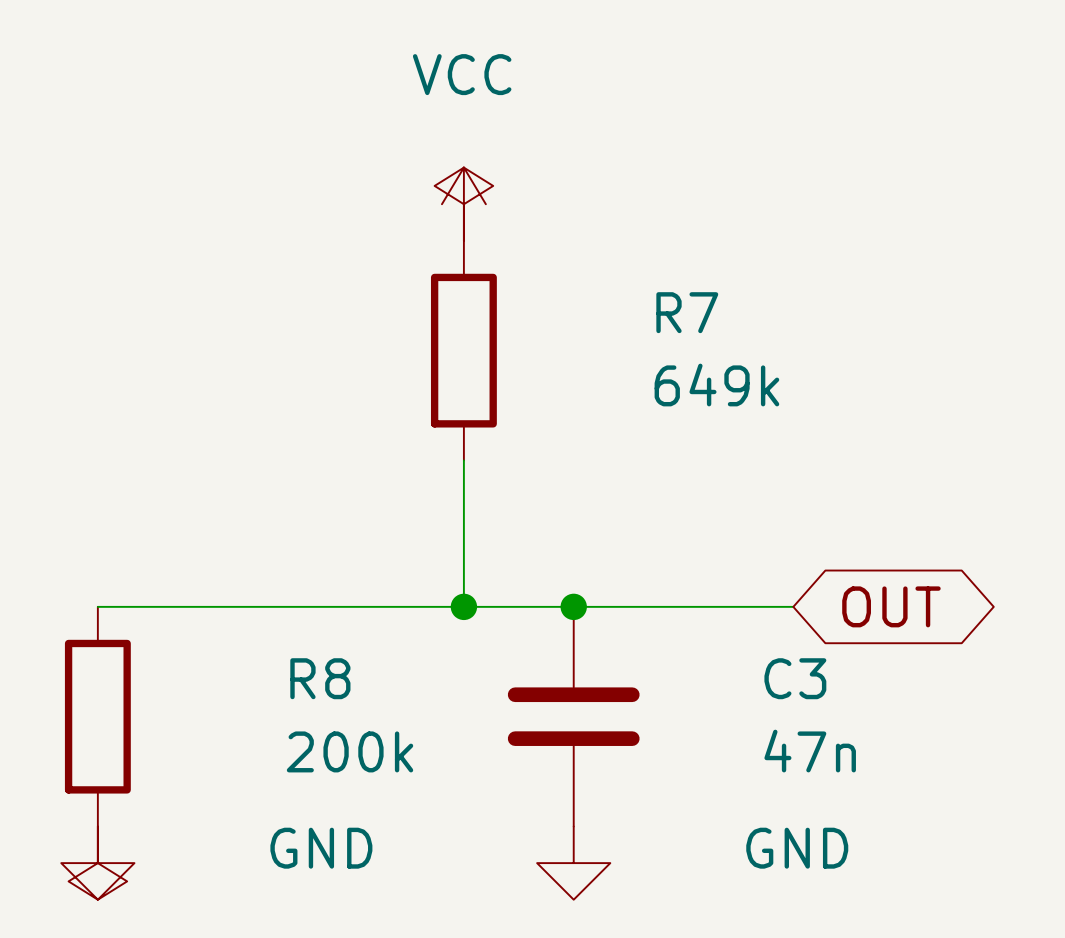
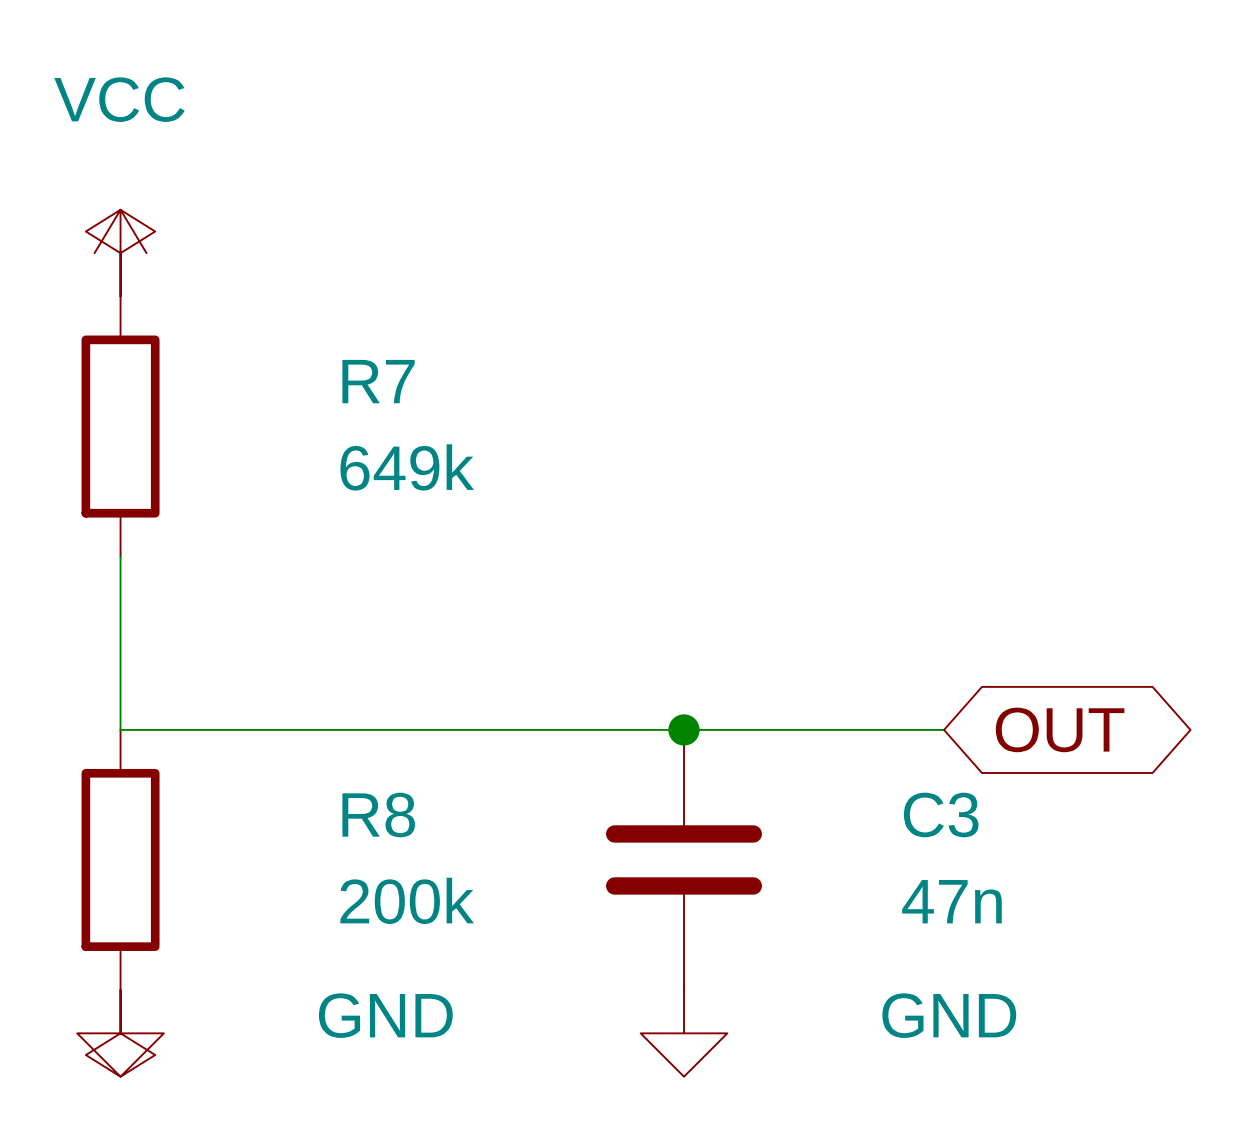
power symbol position: (463, 204) -> (120, 253)
power symbol position: VCC (463, 204) -> VCC (120, 253)
R7 position: (463, 350) -> (120, 426)
wire: (463, 460) (463, 606) -> (120, 556) (120, 729)
junction: (463, 606) -> none

